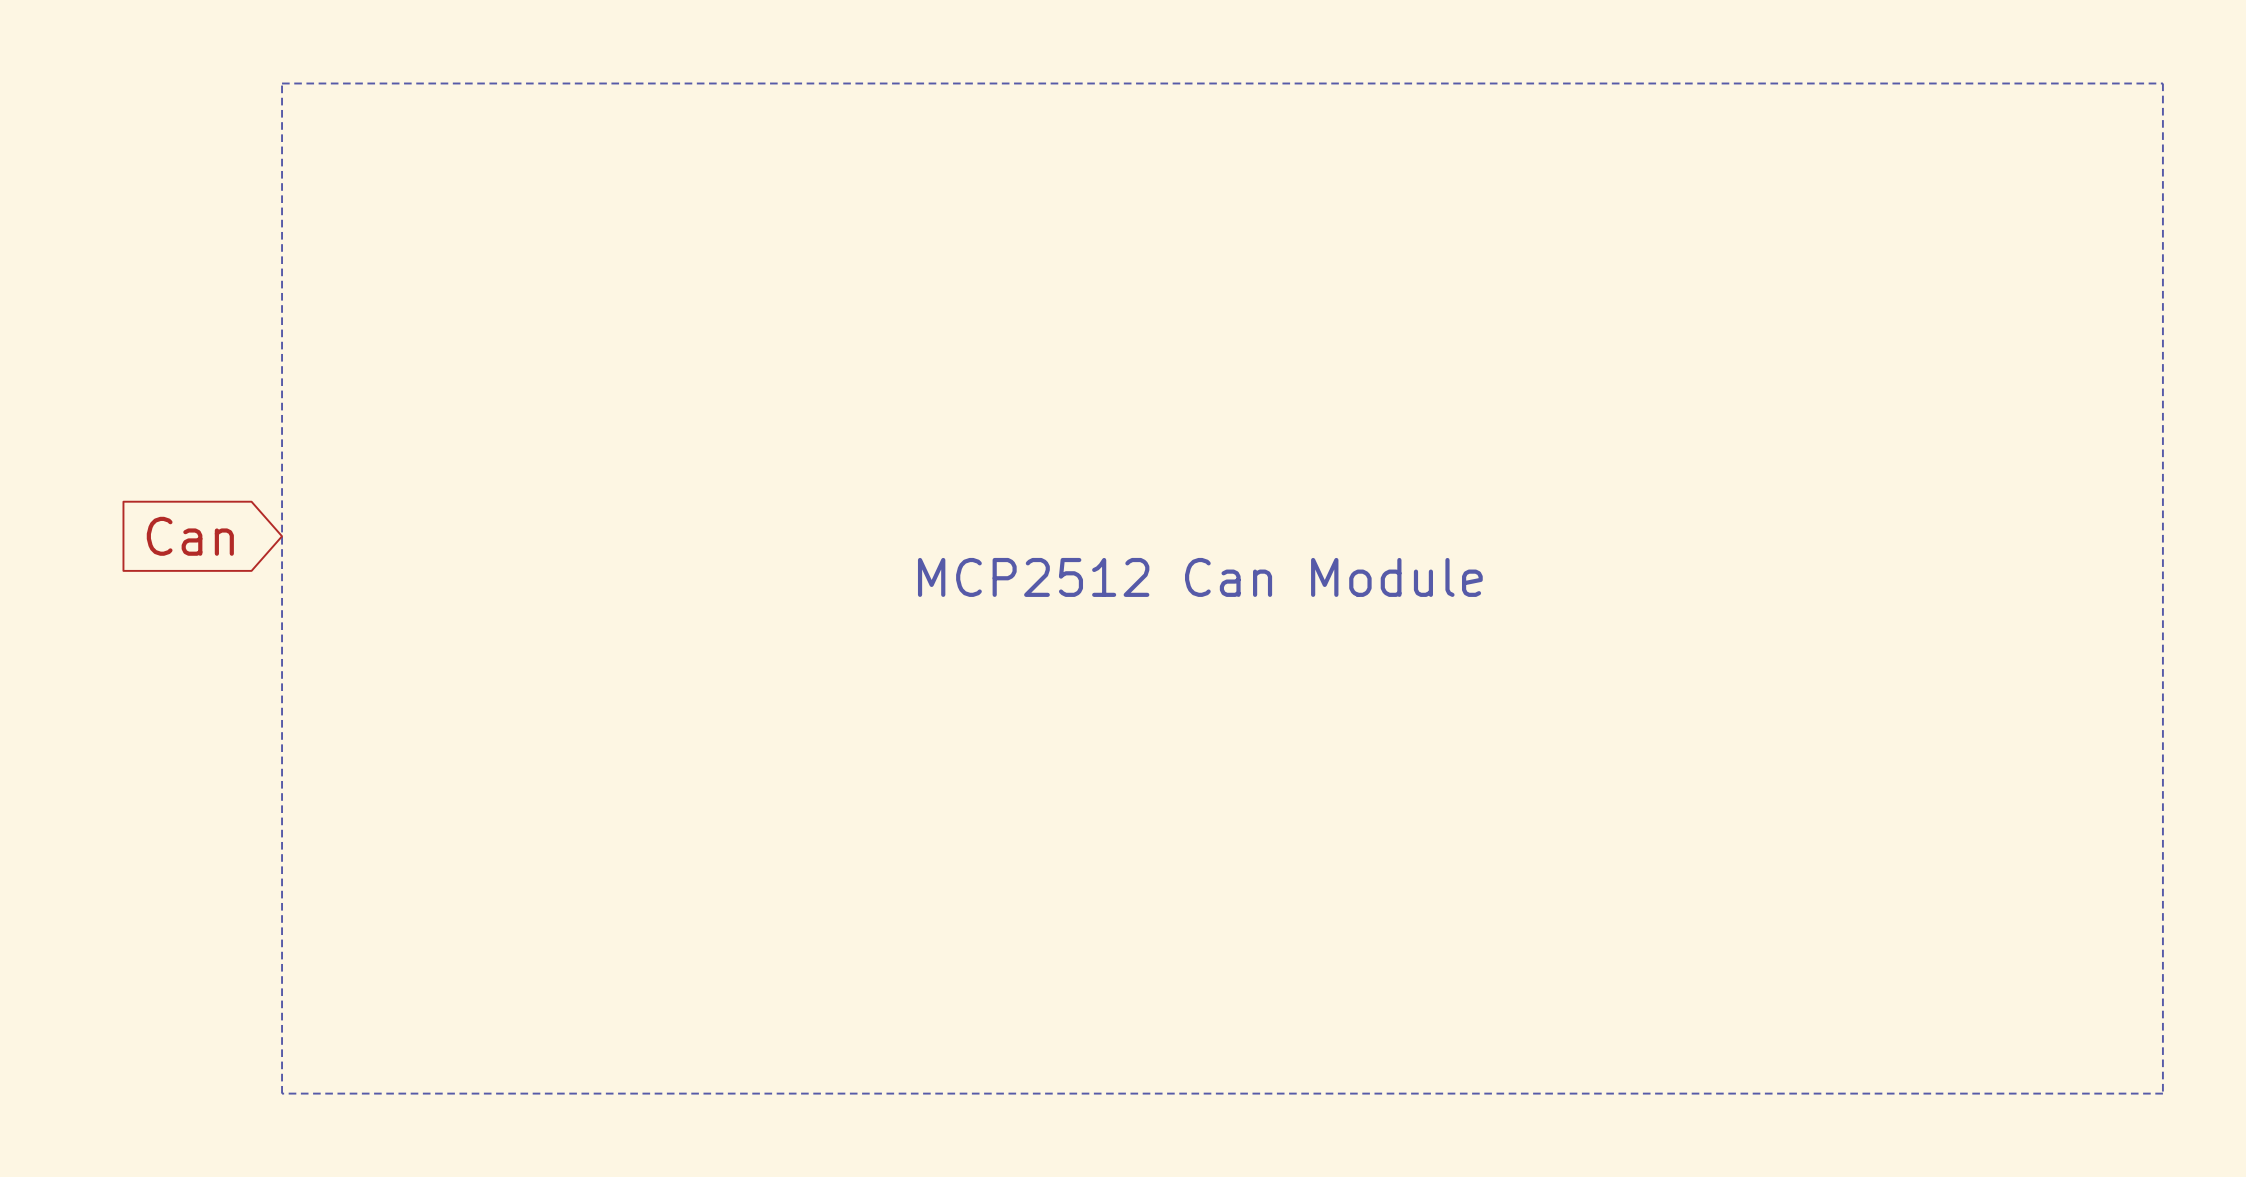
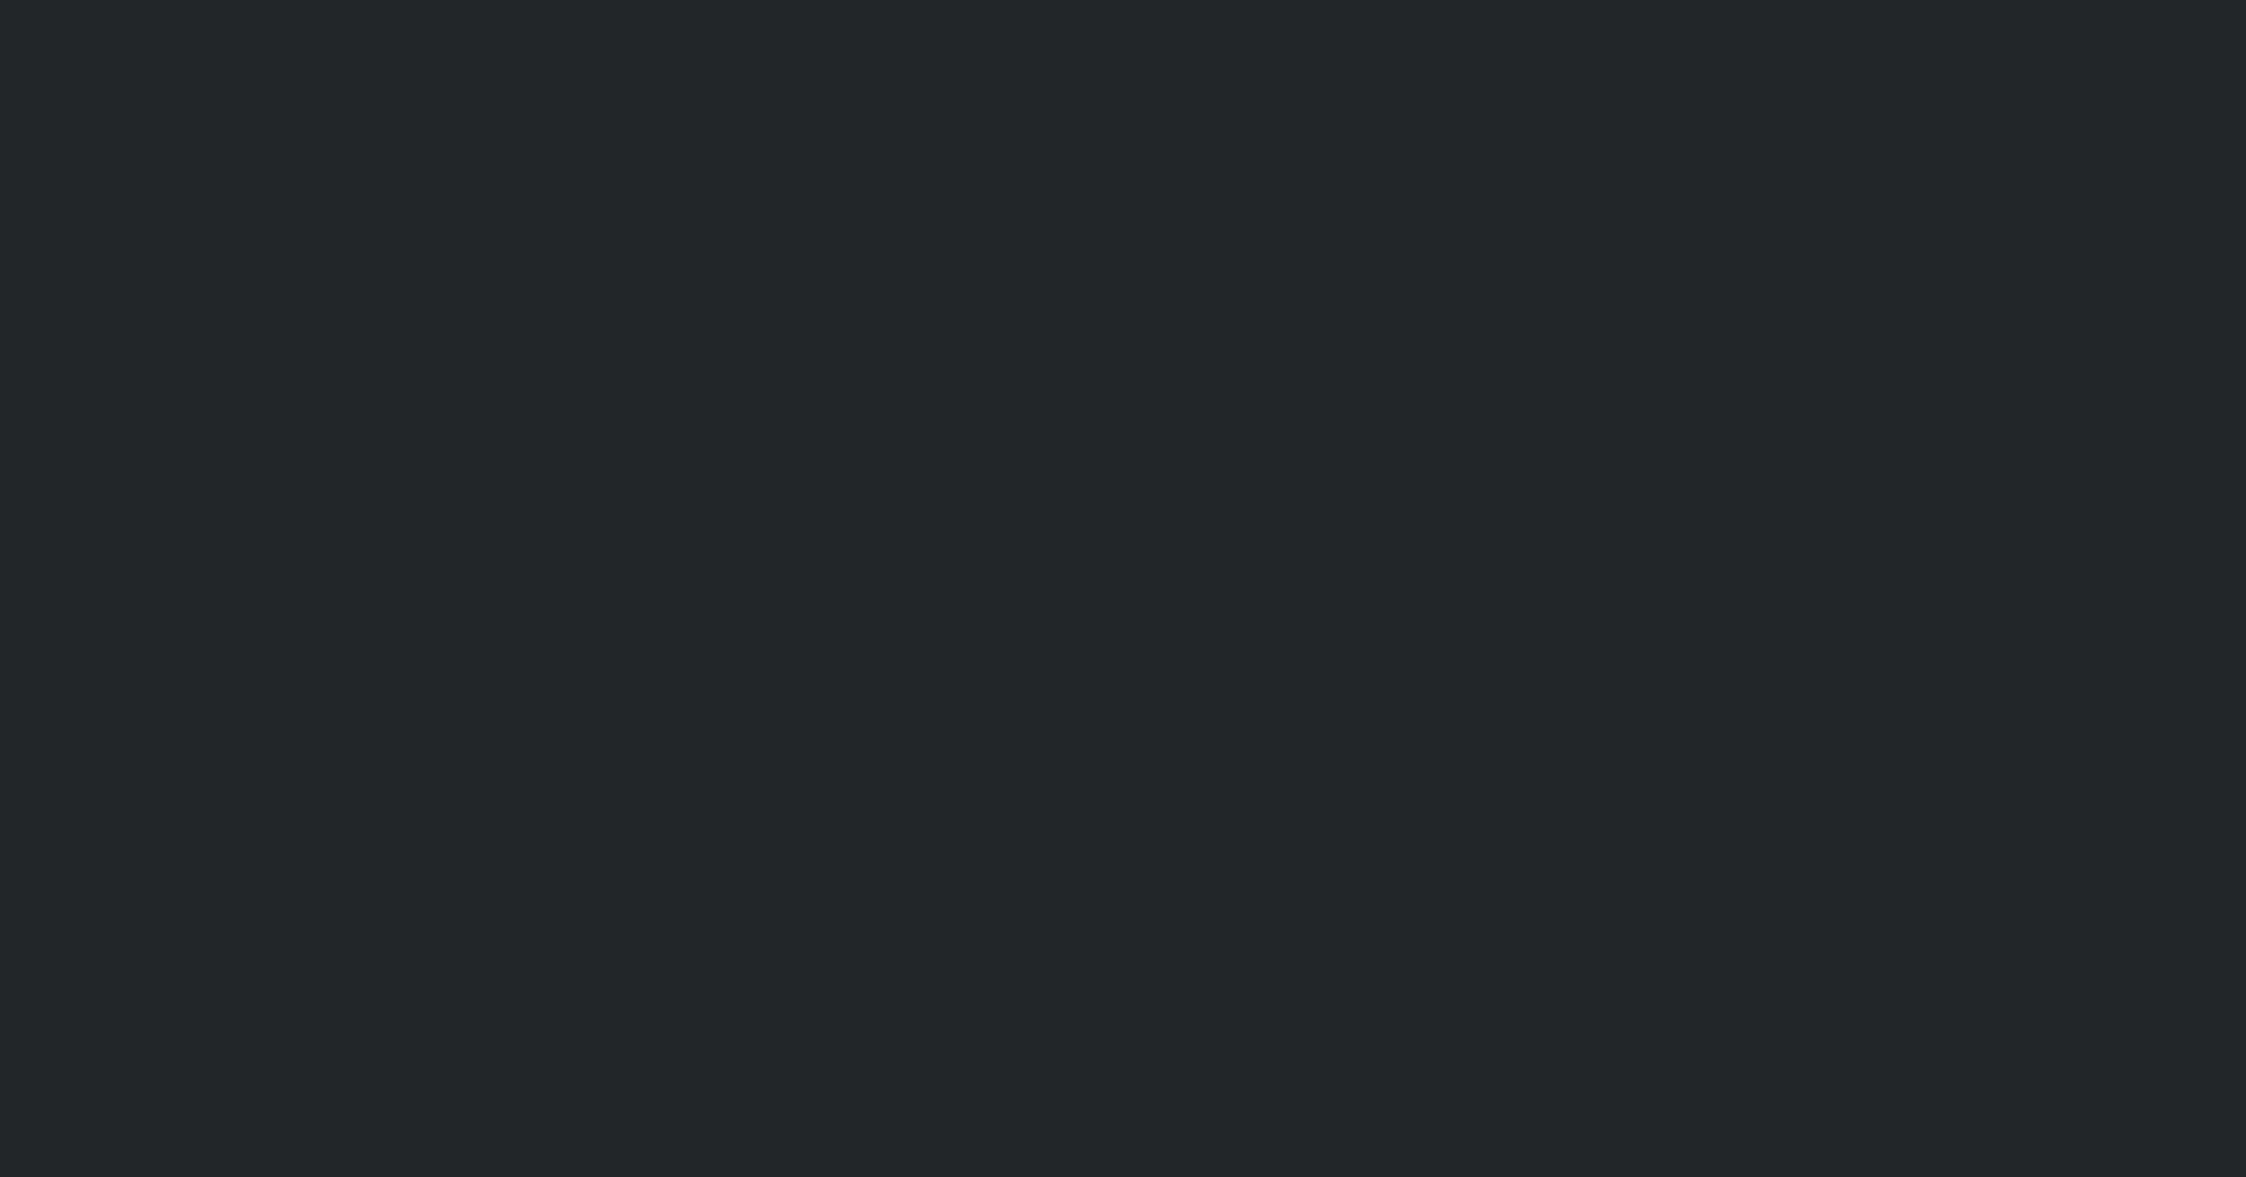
line: (282, 83) (282, 1093) (2162, 1093) (2162, 83) (282, 83) -> none
global label: Can (190, 536) -> none
text: MCP2512 Can Module (1200, 577) -> none

